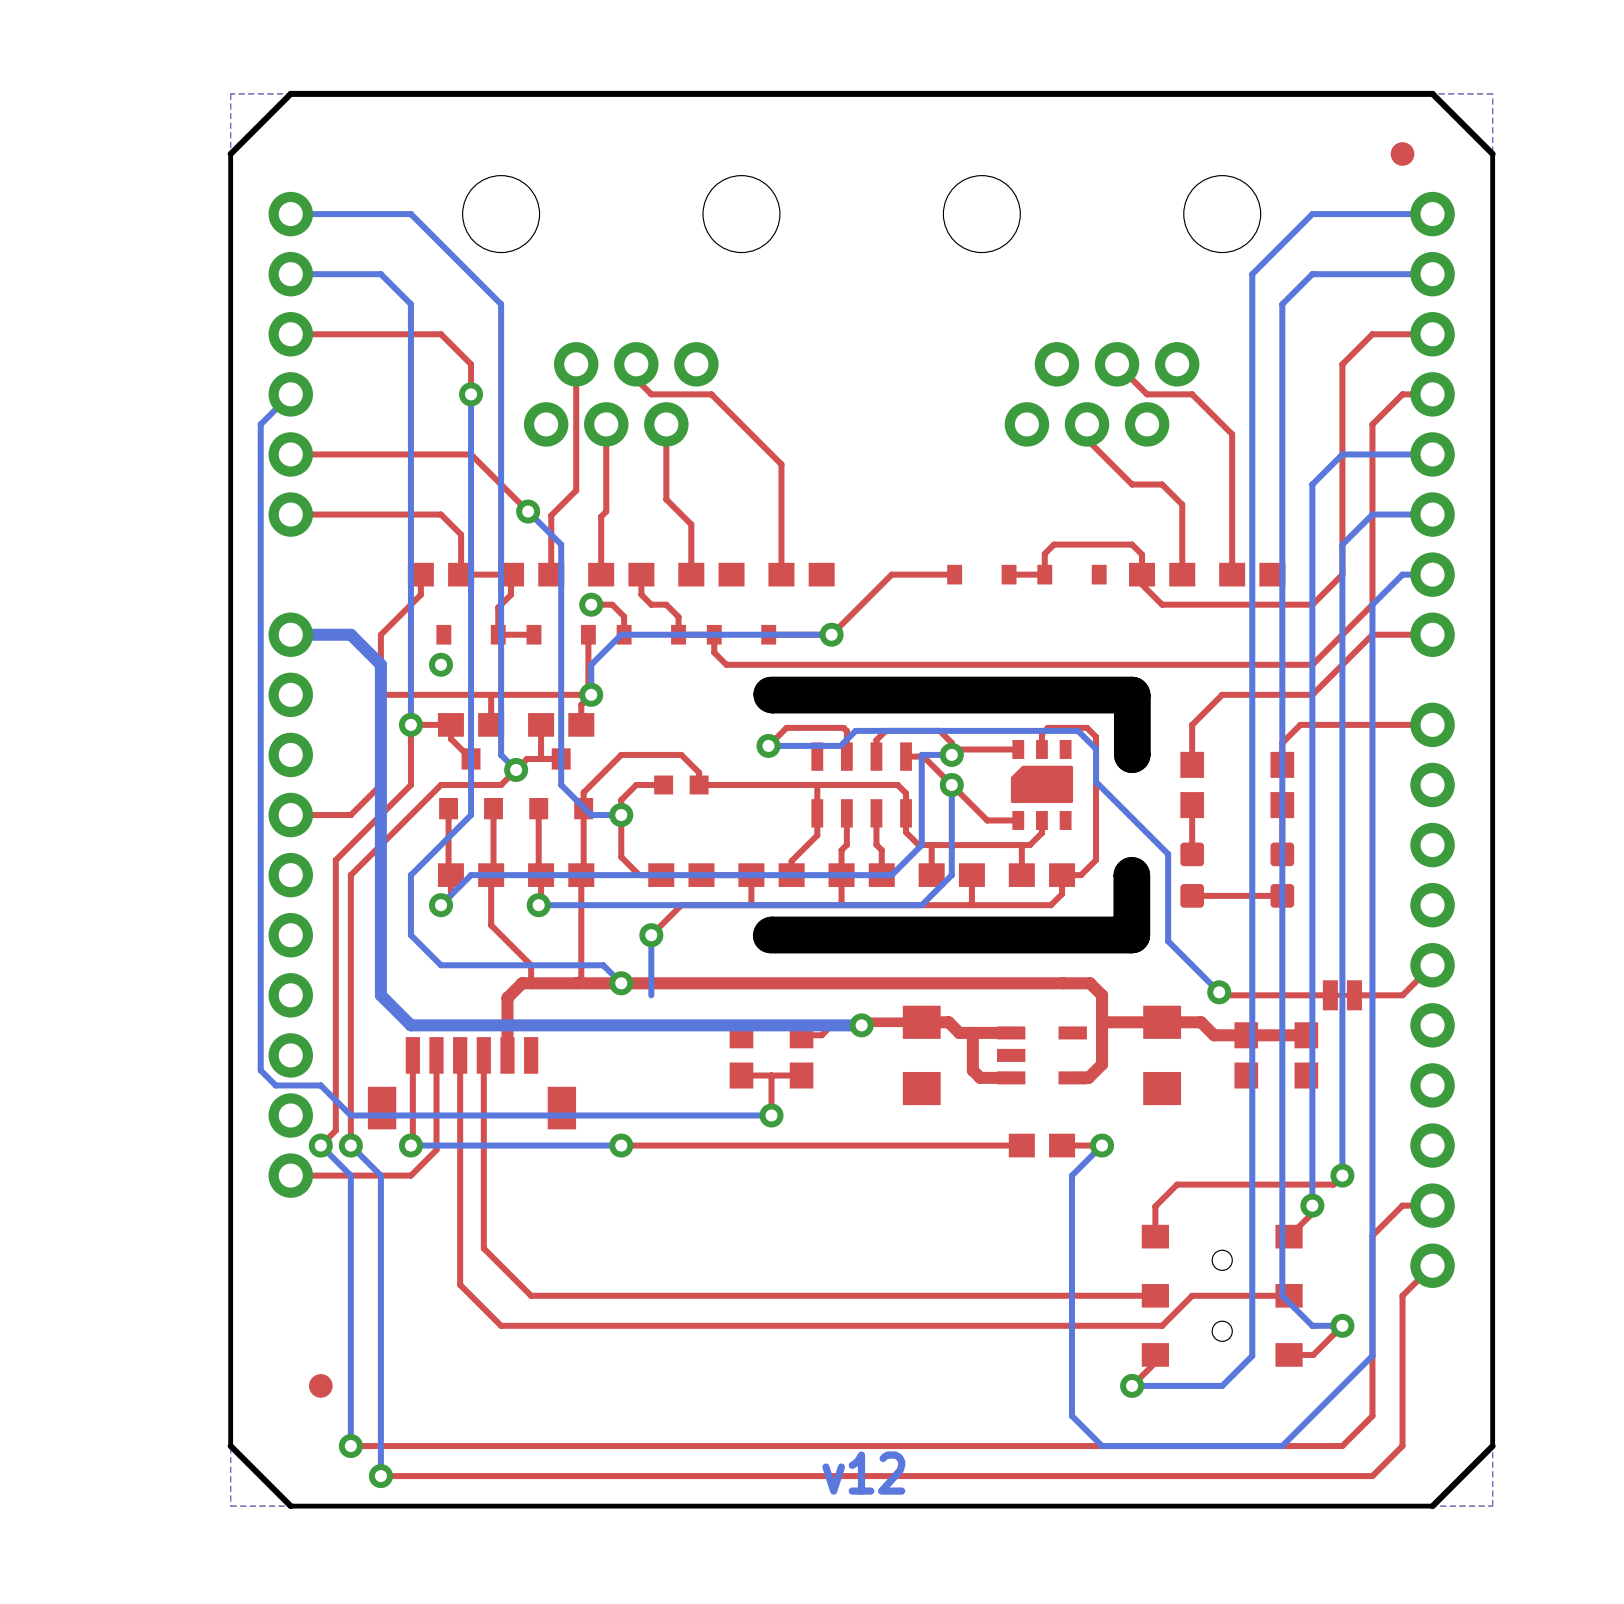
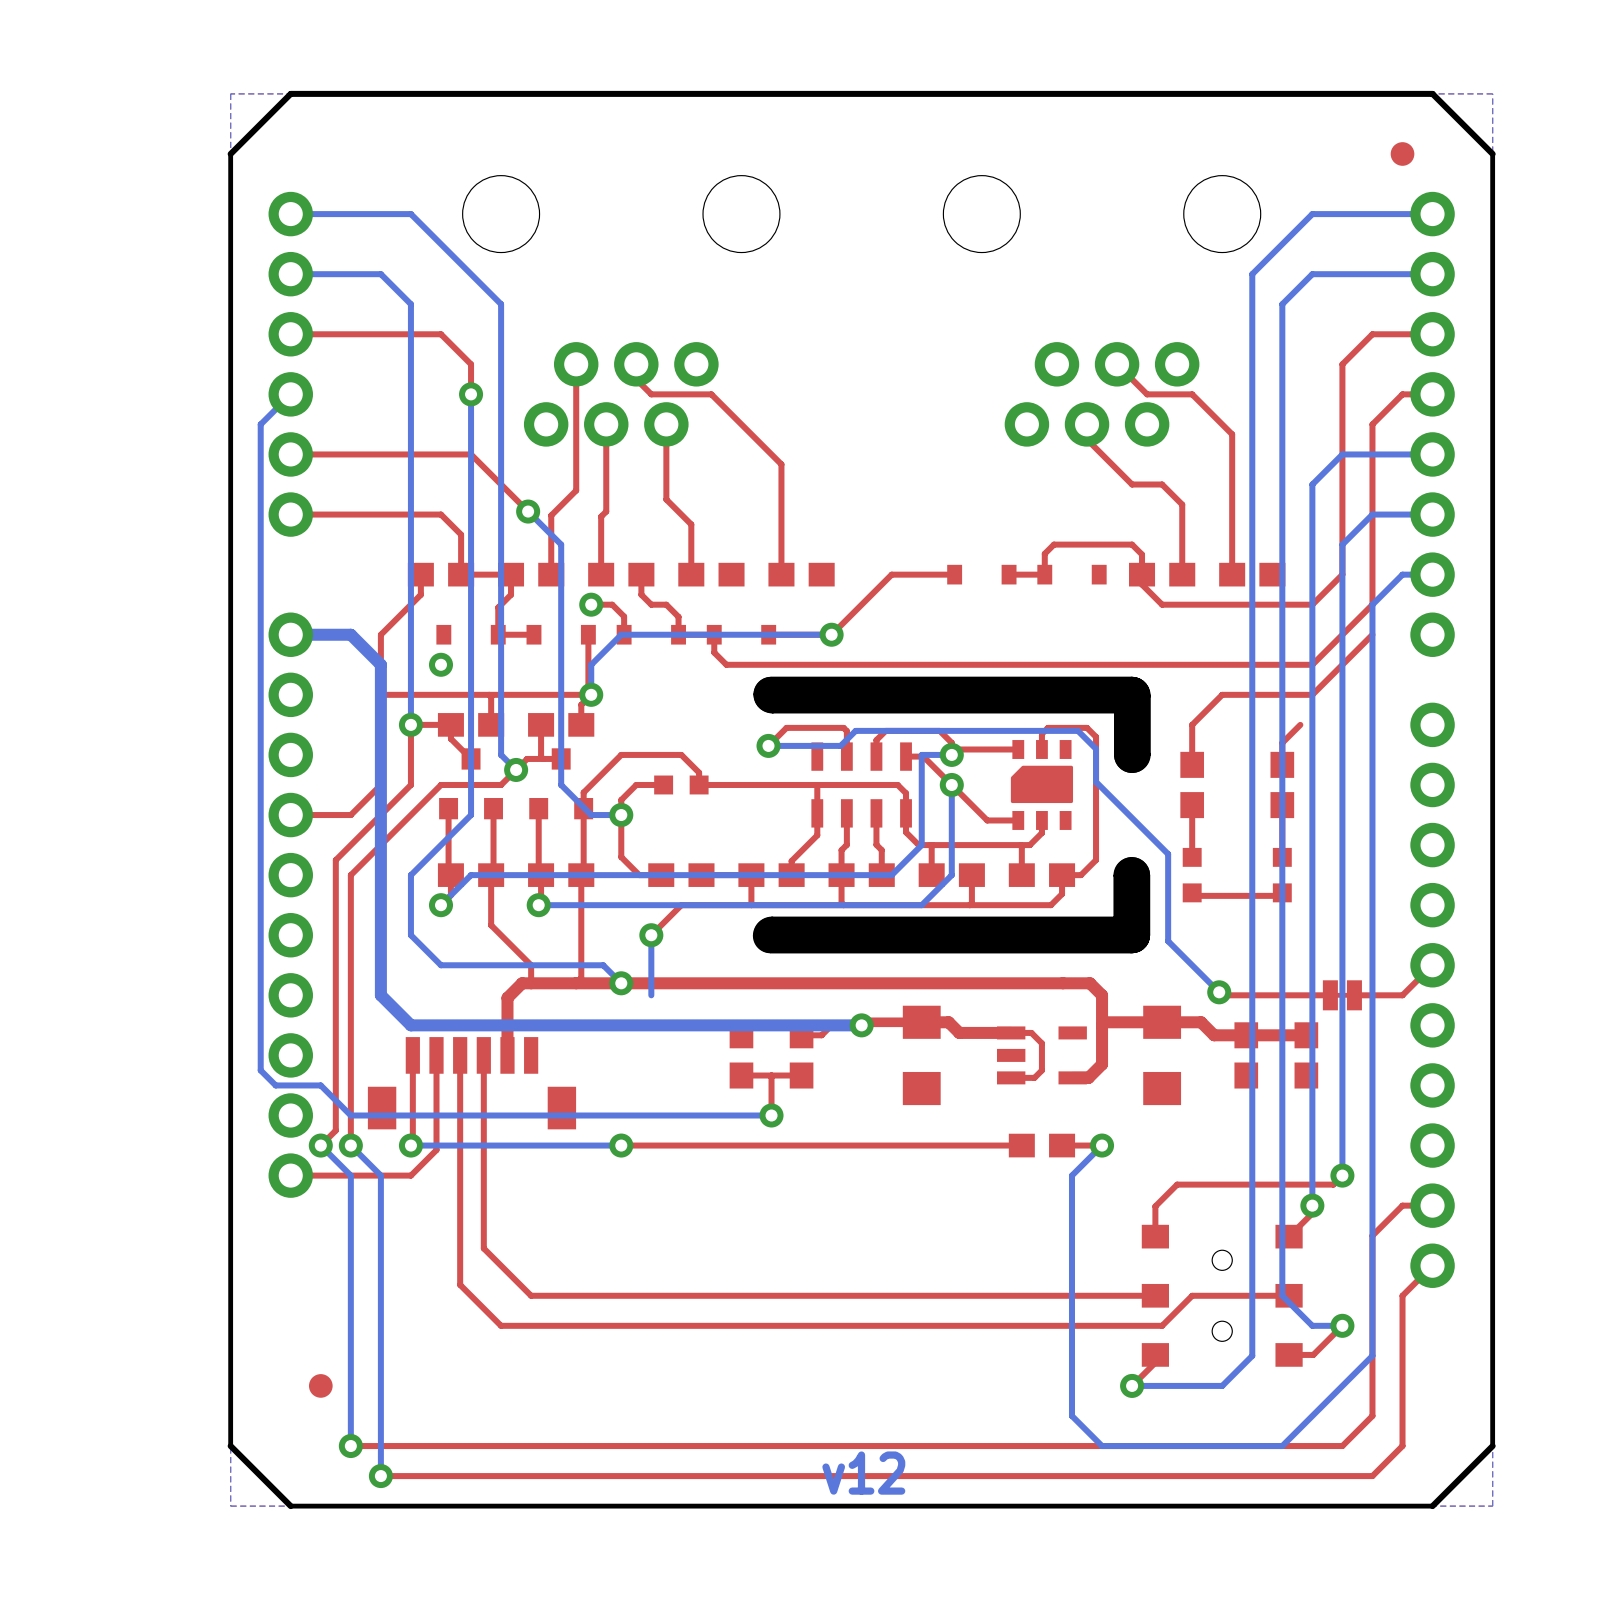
top track: (1432, 634) (1372, 634) -> none
top track: (1432, 724) (1300, 724) -> none
part footprint: [1180, 842, 1205, 908] -> [1182, 847, 1202, 903]
part footprint: [1270, 842, 1295, 908] -> [1272, 847, 1292, 903]
top track: (972, 1032) (972, 1070) (980, 1077) (1011, 1077) -> (1011, 1032) (1031, 1032) (1041, 1043) (1041, 1070) (1034, 1077) (1011, 1077)

